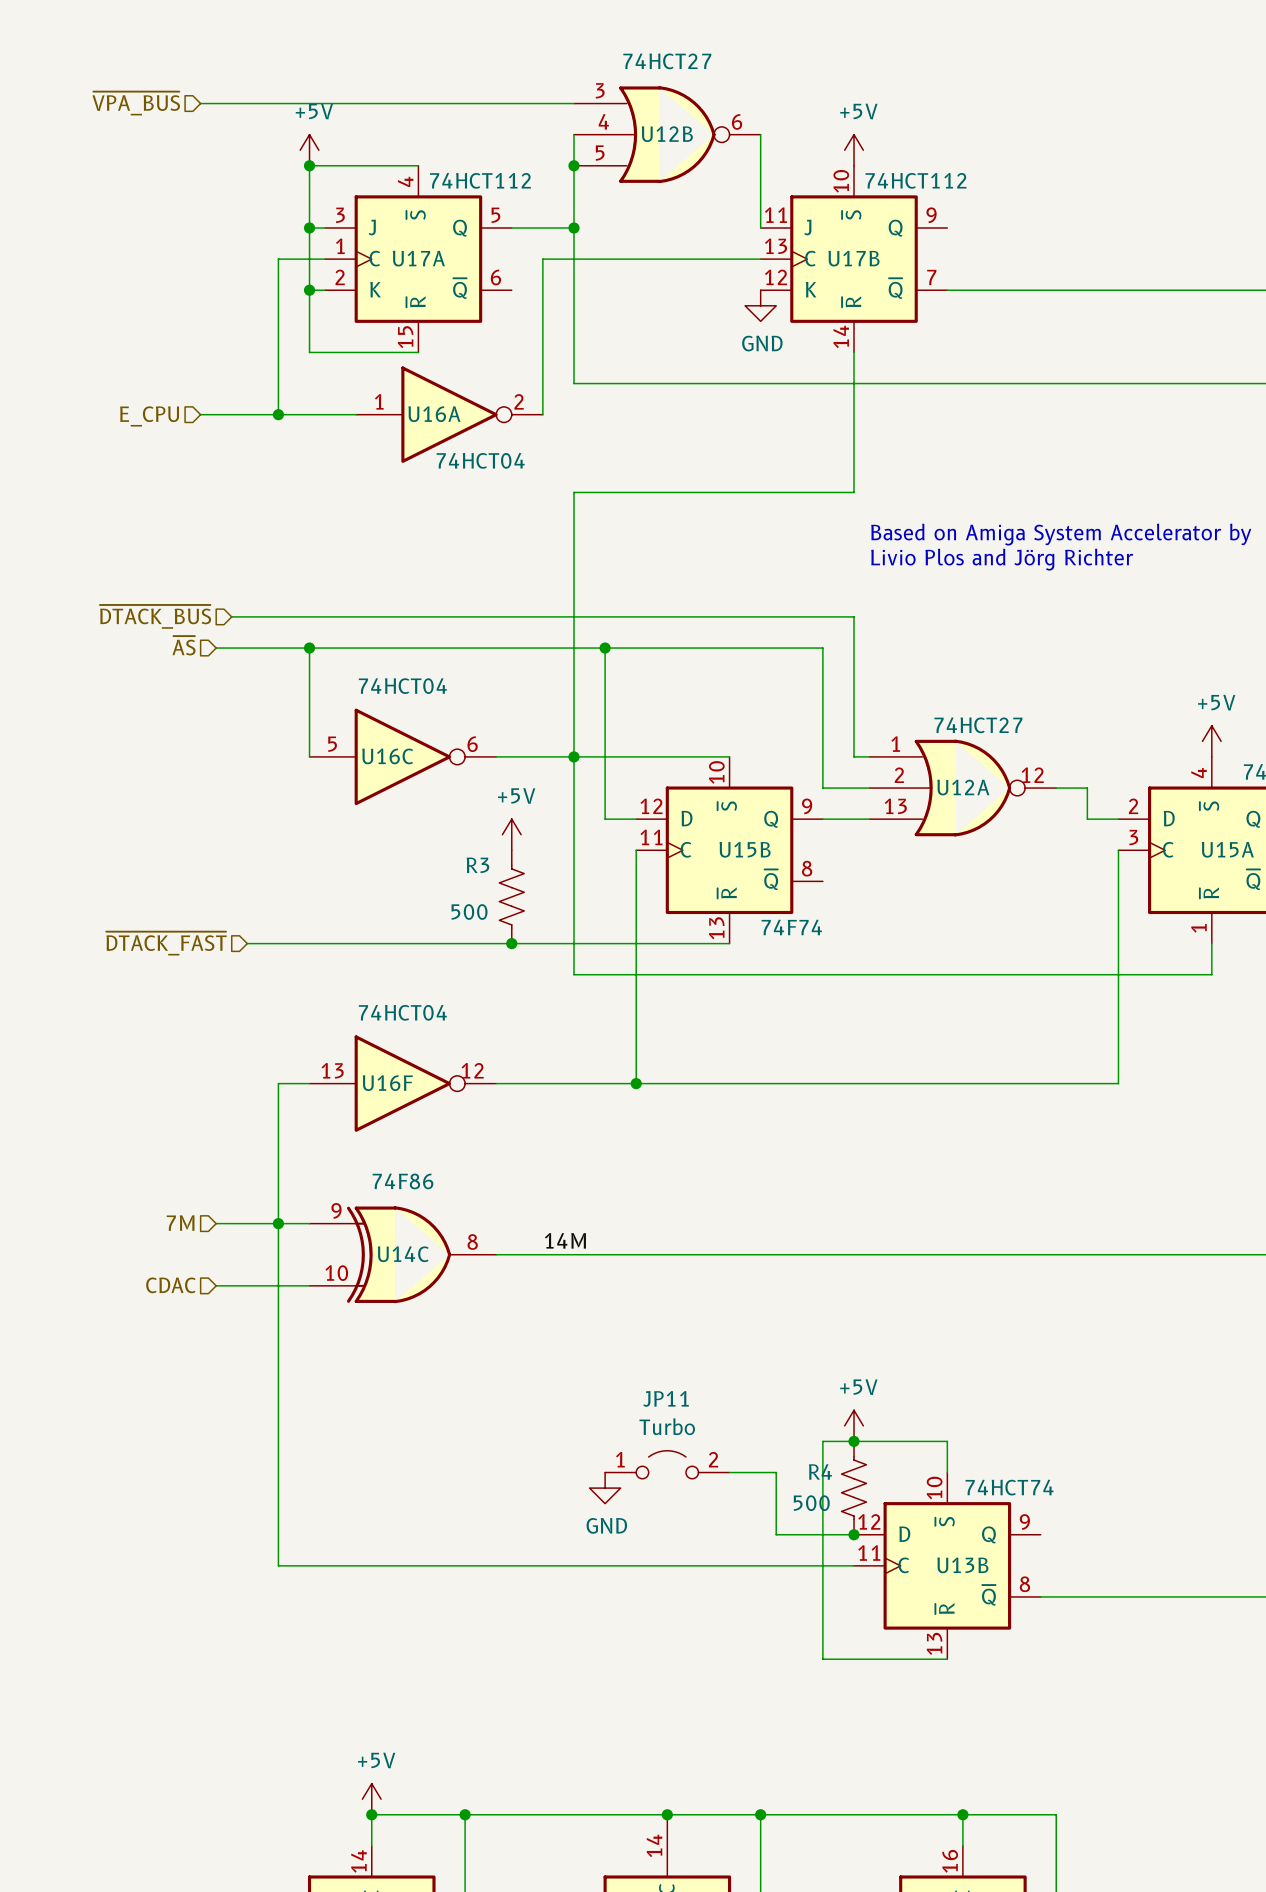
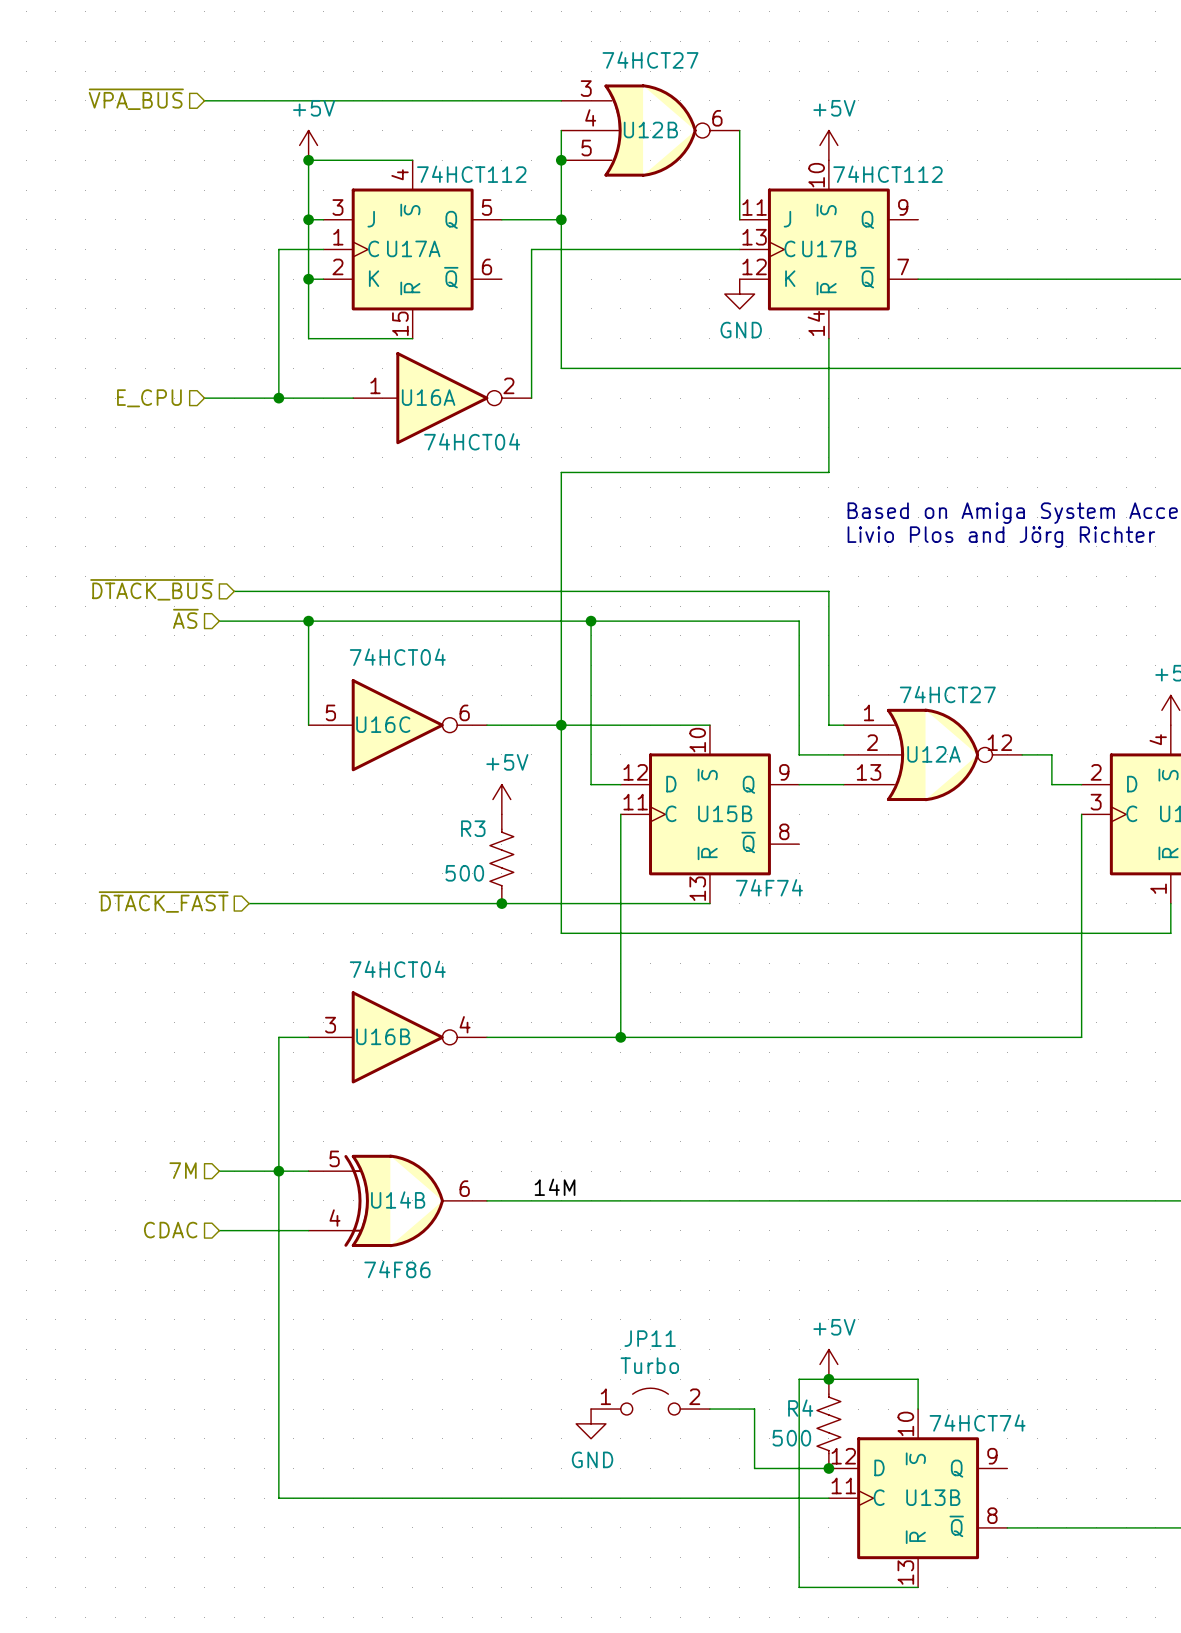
U16F pin number: 13 (332, 1070) -> 3 (330, 1025)
U16F pin number: 12 (472, 1070) -> 4 (465, 1024)
U16F name: U16F (387, 1083) -> U16B (383, 1036)
U14C: 74F86 (402, 1254) -> none
U14B: none -> 74F86 (397, 1200)

